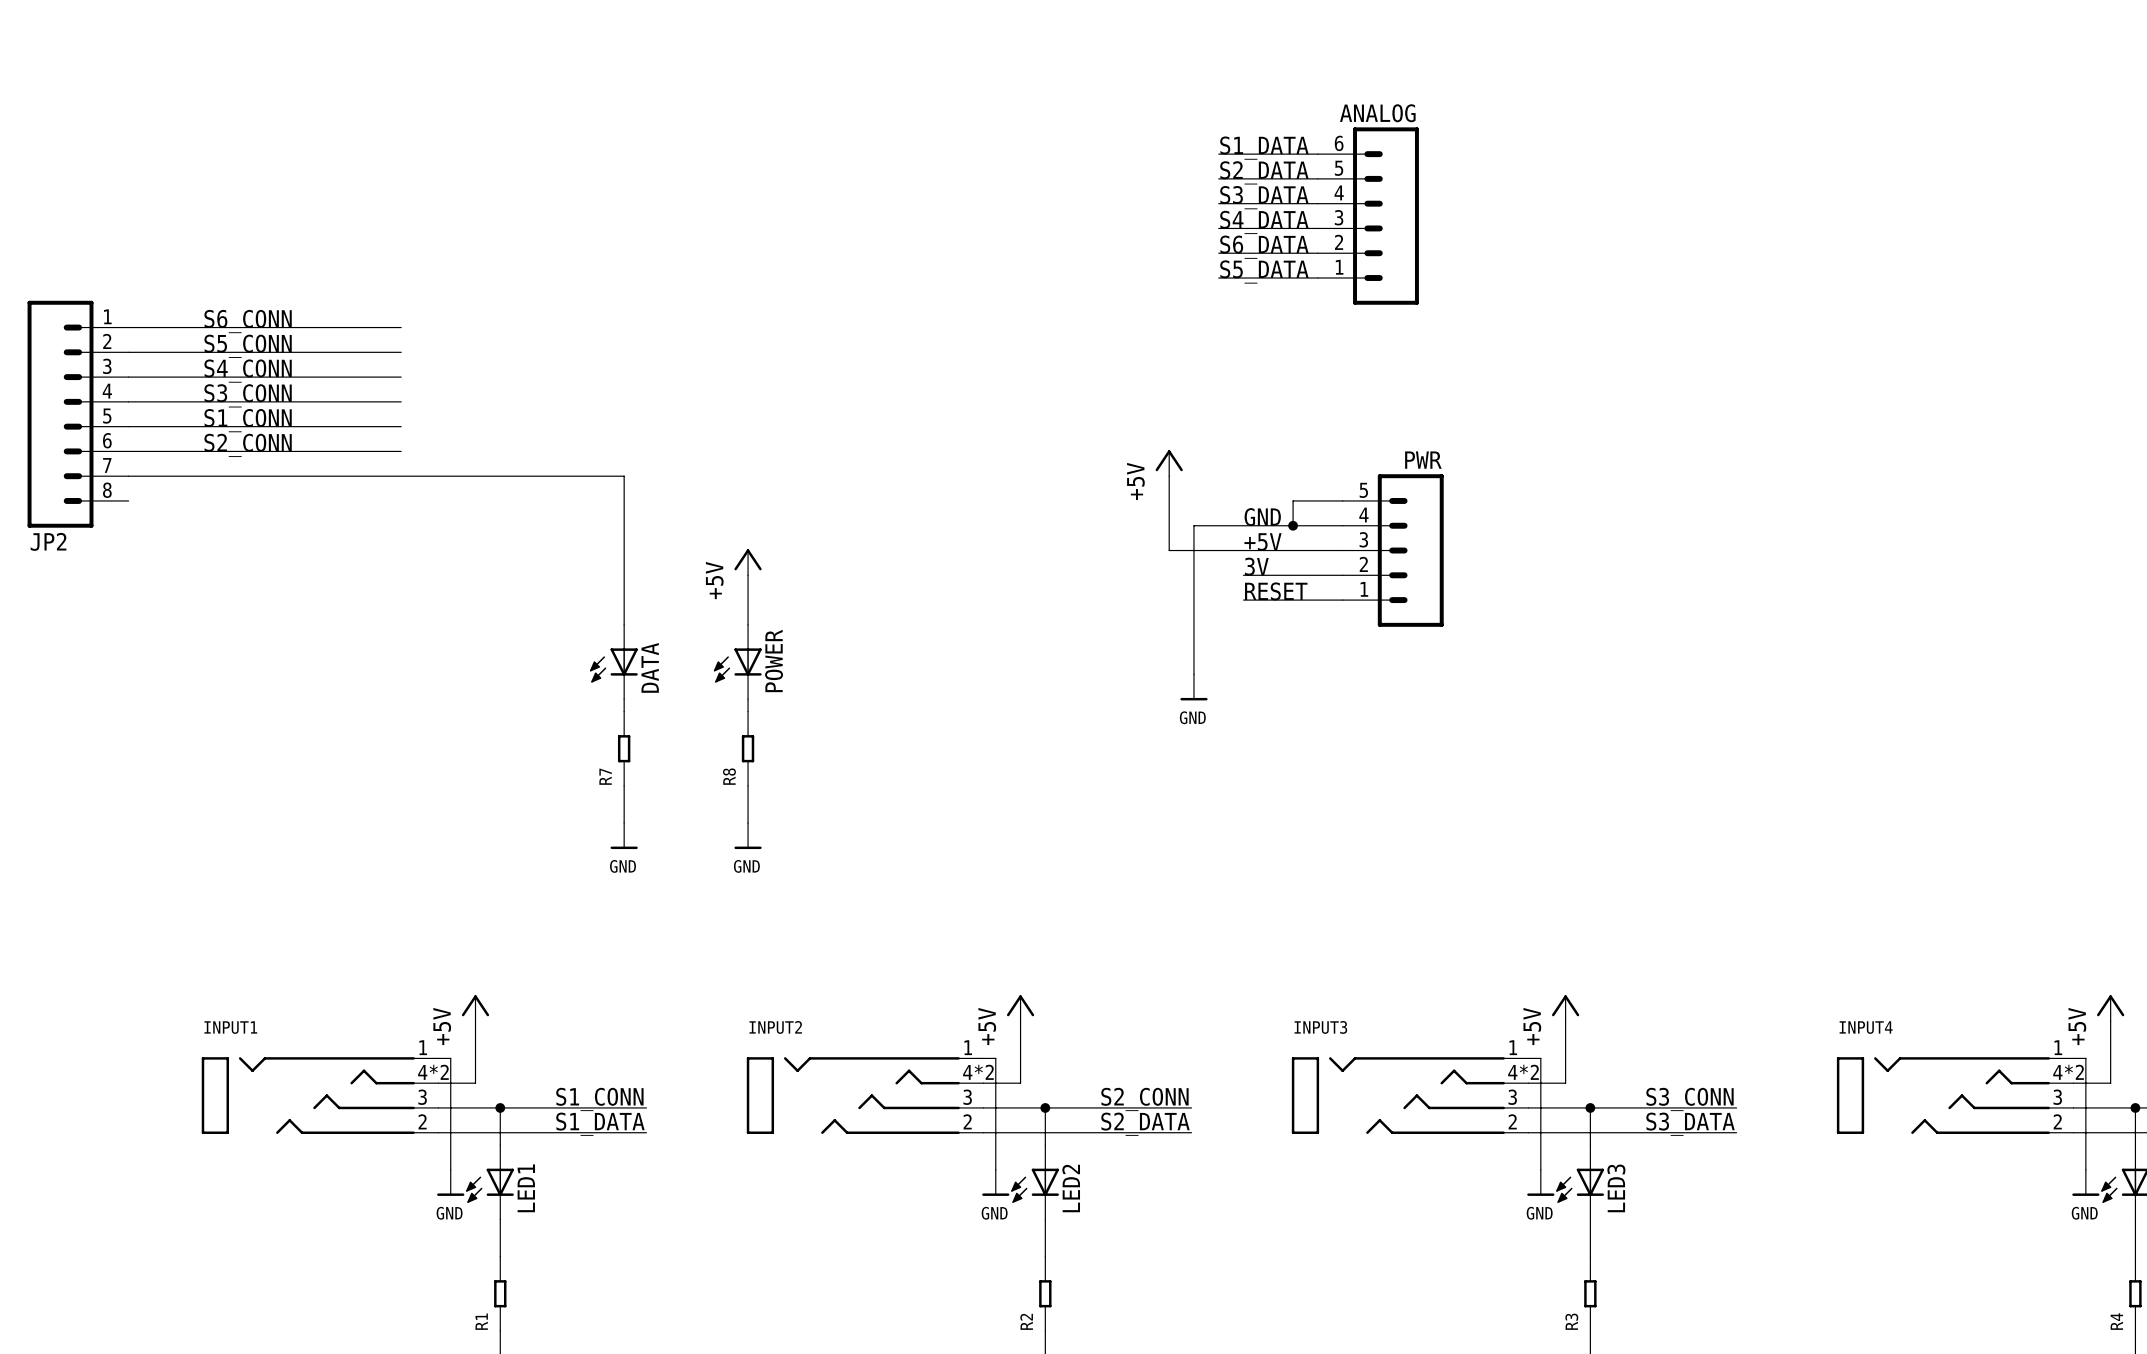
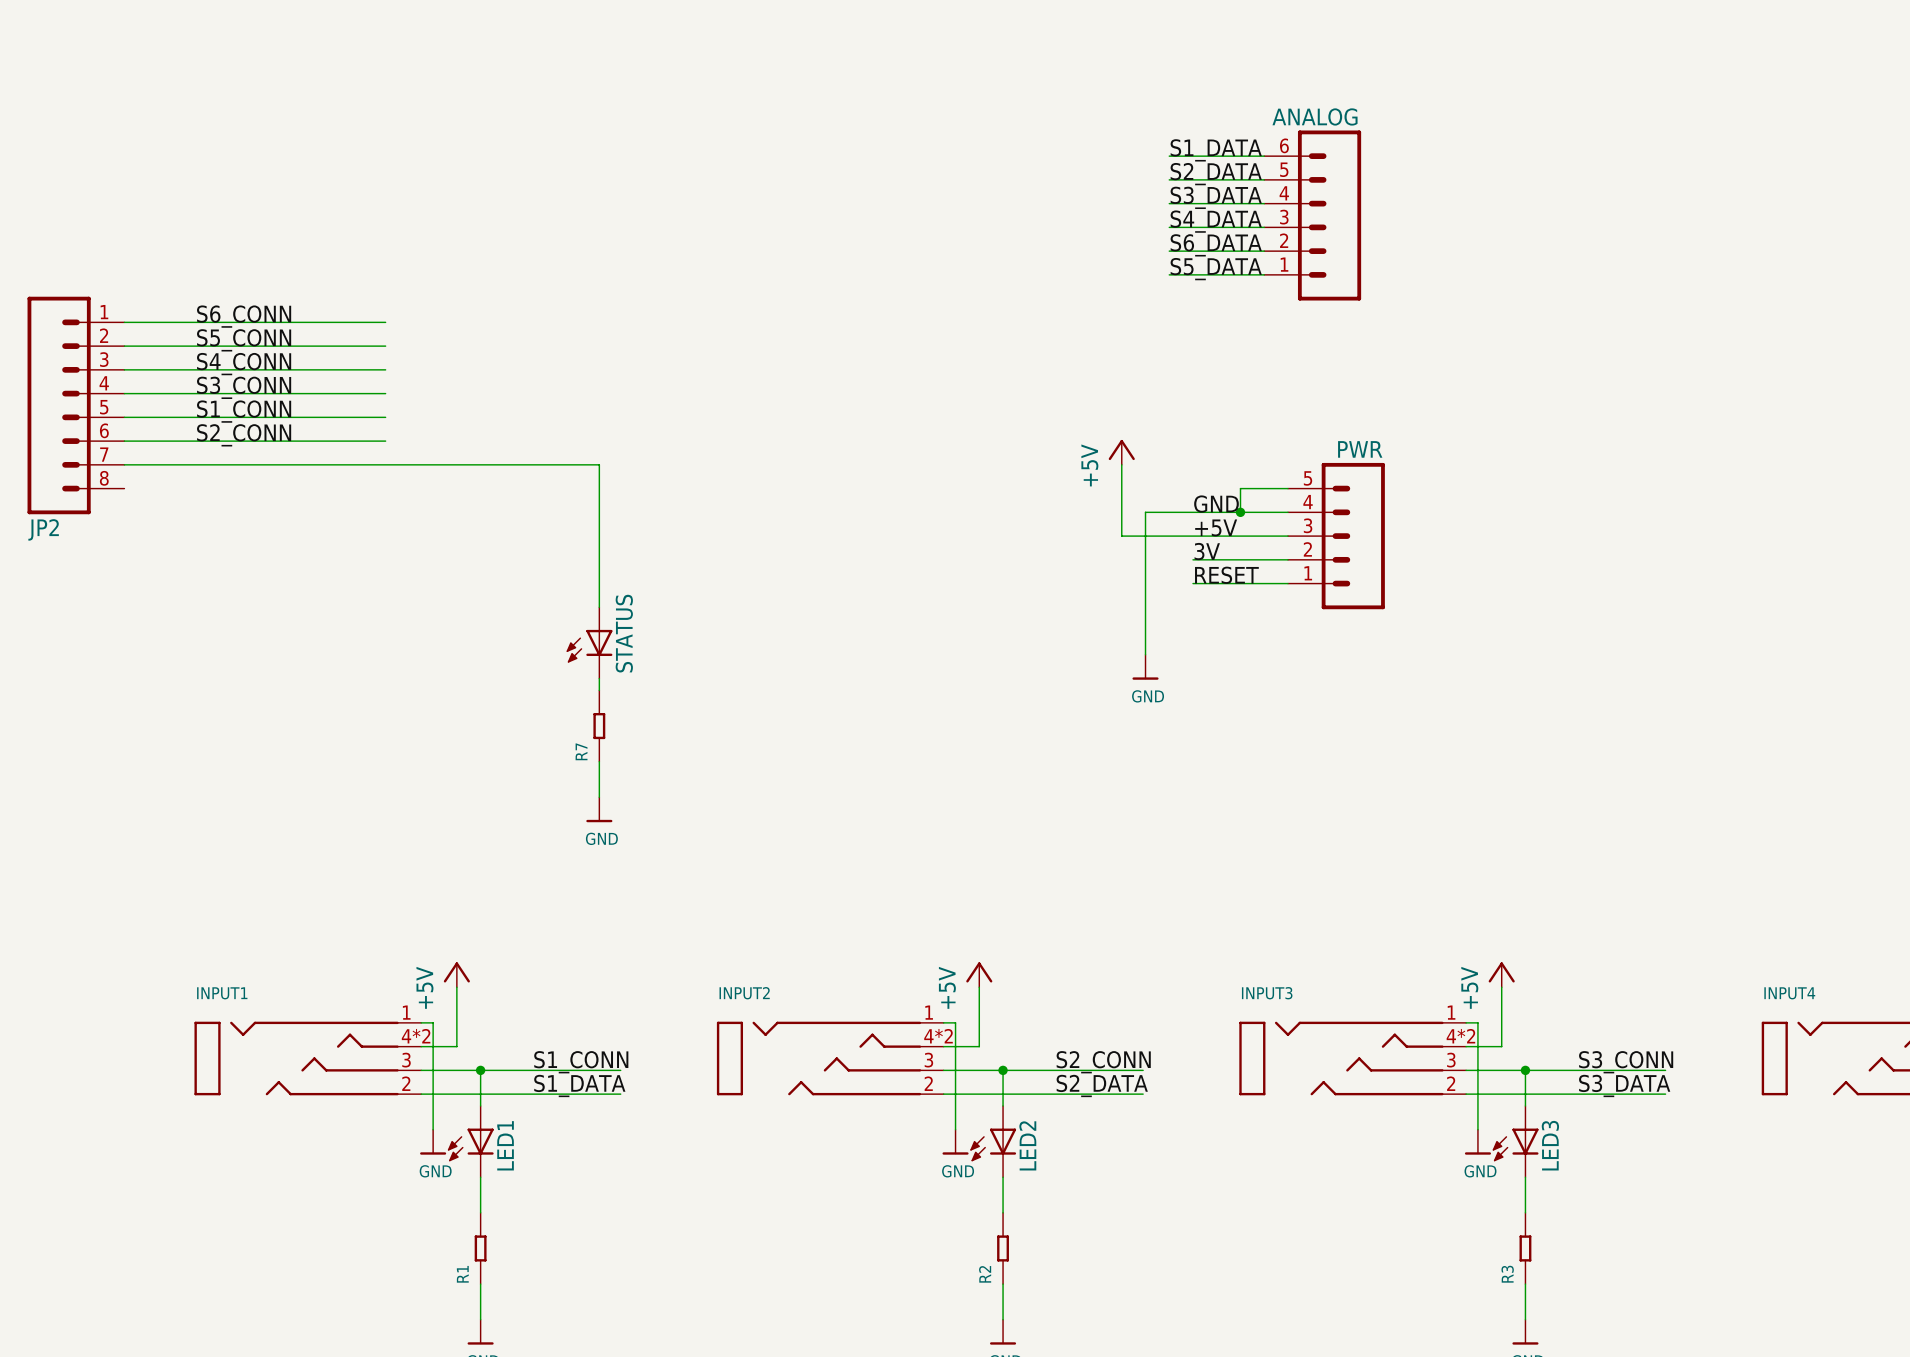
power symbol: +5V (748, 562) -> none
wire: (748, 575) (748, 624) -> none
POWER: (737, 662) -> none
DATA name: DATA (650, 667) -> STATUS (624, 633)
wire: (748, 699) (748, 711) -> none
R8: (748, 748) -> none
wire: (748, 785) (748, 823) -> none
power symbol: GND (748, 836) -> none

